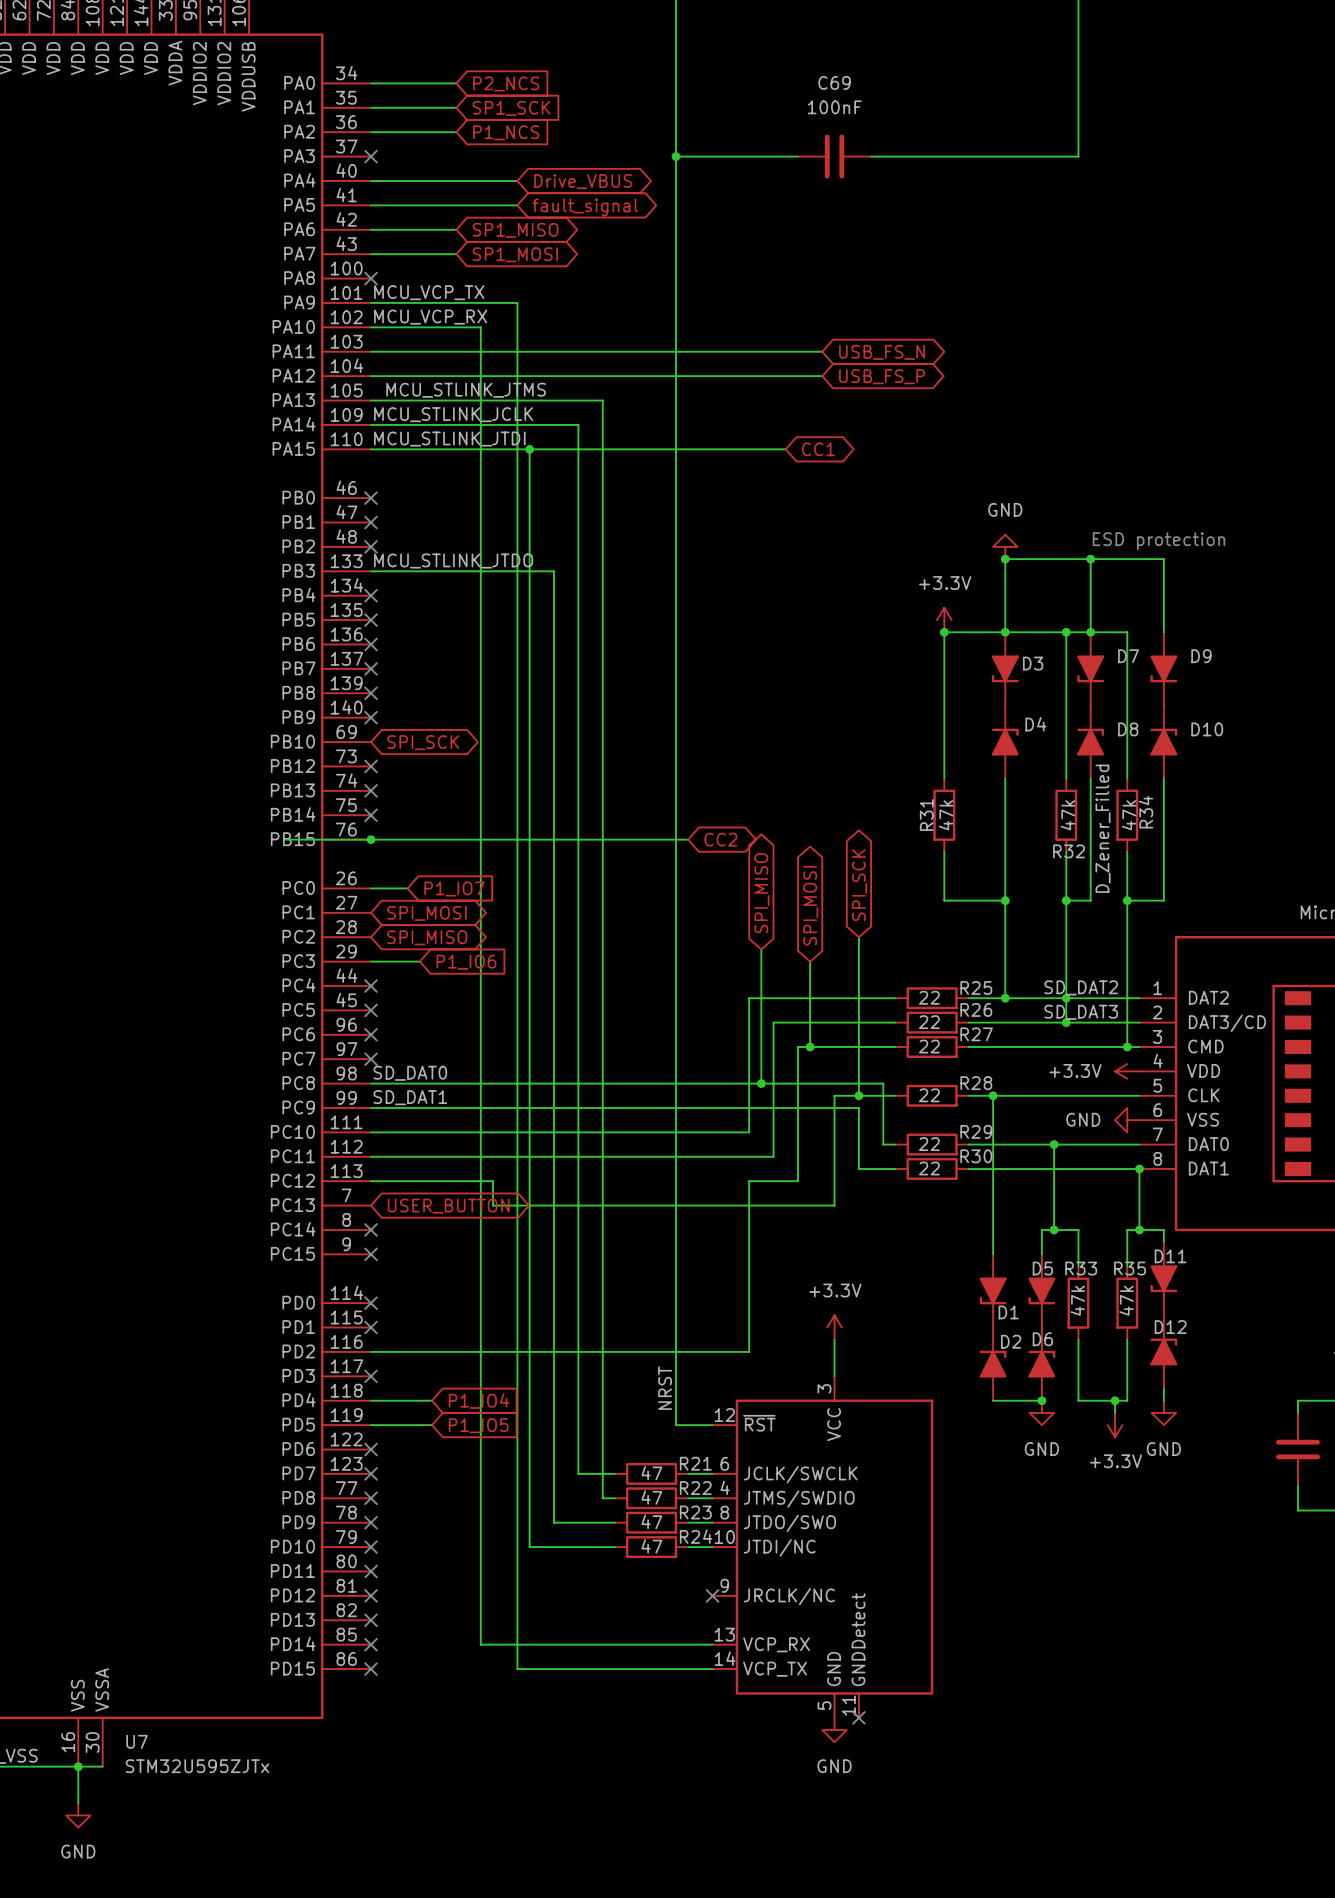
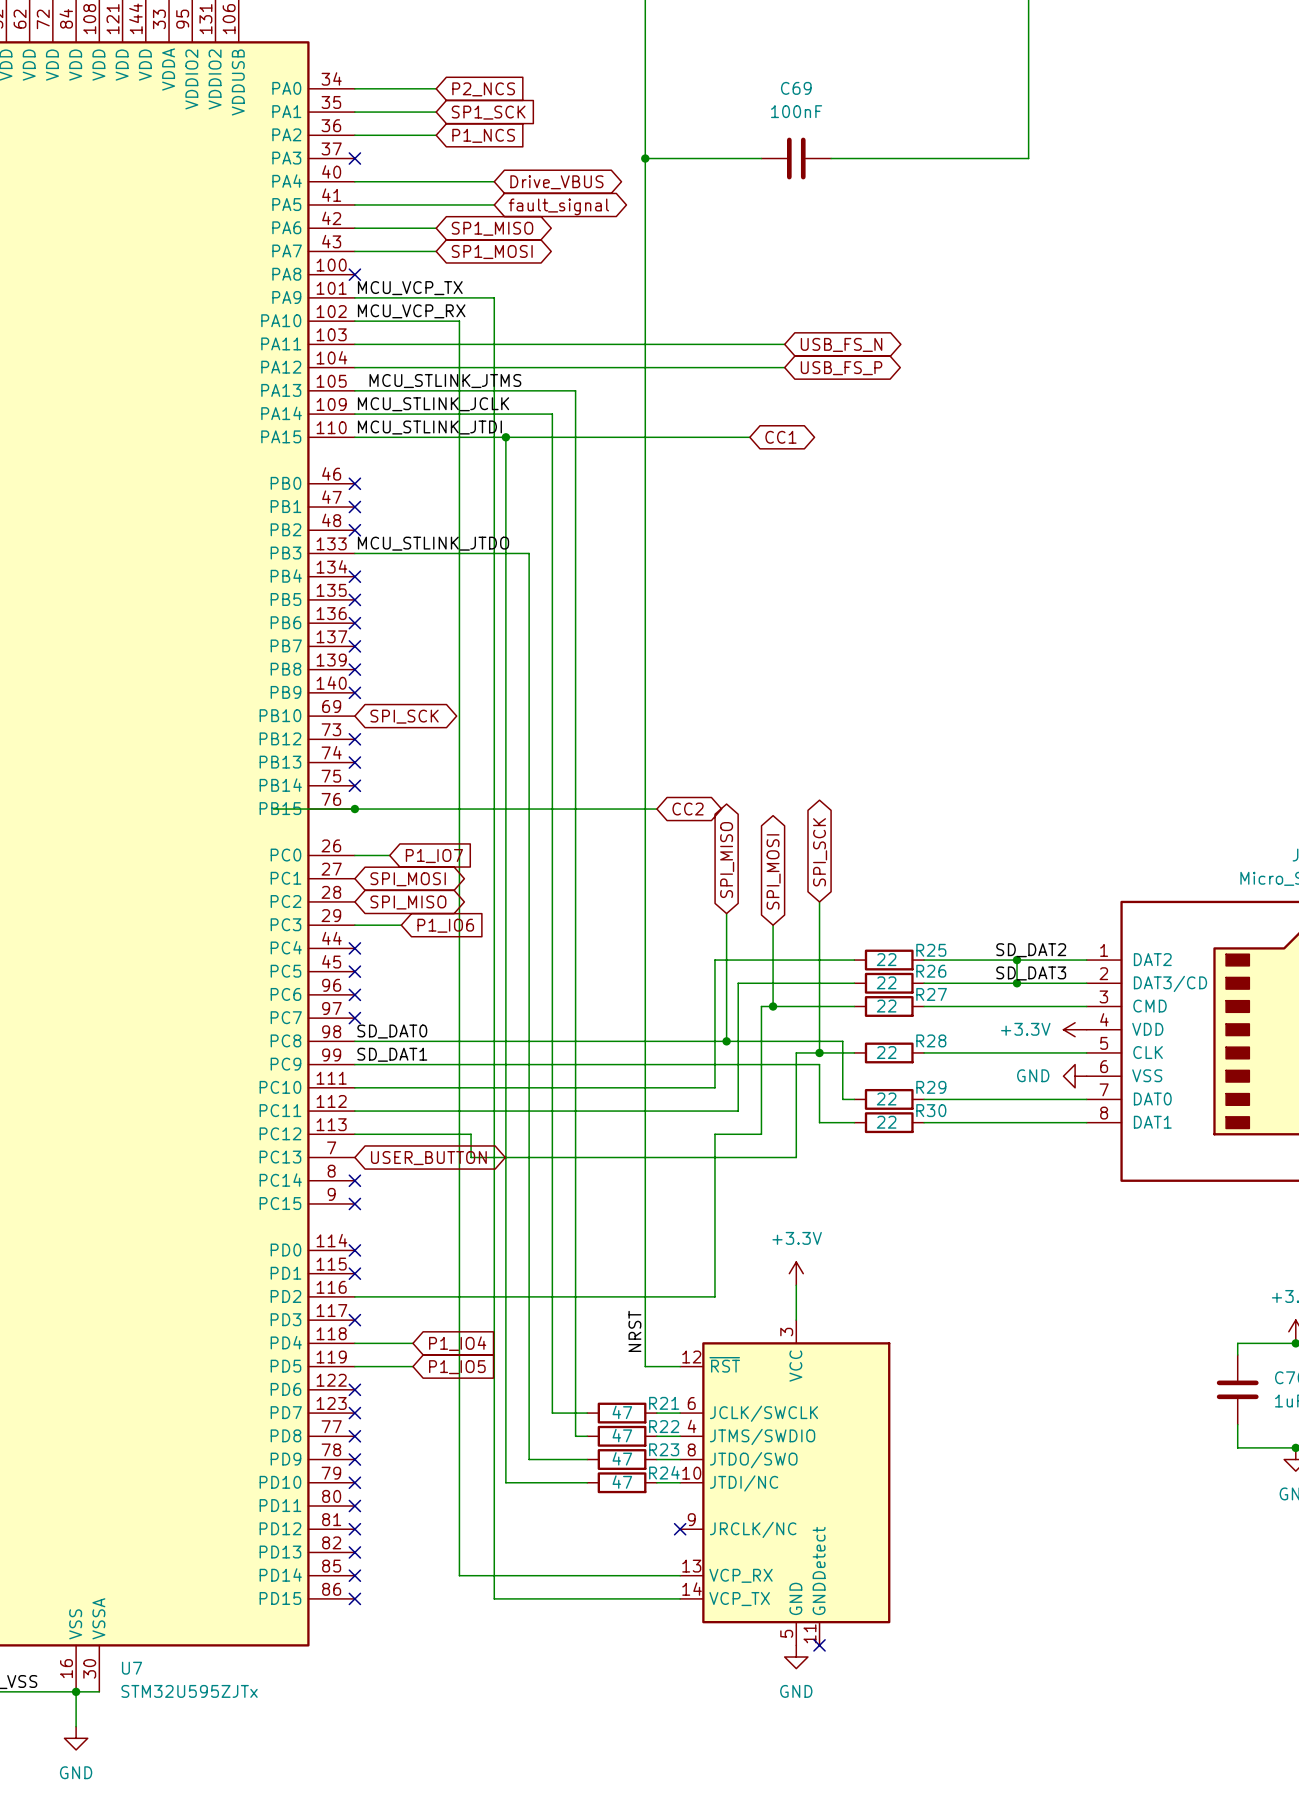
text: ESD protection (1158, 541) -> none
power symbol: GND (1005, 546) -> none
junction: (1005, 559) -> none
wire: (1090, 559) (1090, 632) -> none
junction: (1090, 559) -> none
power symbol: +3.3V (944, 620) -> none
junction: (944, 632) -> none
wire: (1005, 632) (1005, 559) (1163, 559) (1163, 632) -> none
junction: (1005, 632) -> none
wire: (1066, 632) (1066, 778) -> none
junction: (1066, 632) -> none
junction: (1090, 632) -> none
D3: (1005, 668) -> none
D7: (1090, 668) -> none
D9: (1163, 668) -> none
D4: (1005, 742) -> none
D8: D_Zener_Filled (1090, 742) -> none
D10: (1163, 742) -> none
wire: (944, 778) (944, 632) (1127, 632) (1127, 778) -> none
wire: (1005, 778) (1005, 998) -> none
wire: (1090, 778) (1090, 900) (1066, 900) -> none
wire: (1163, 778) (1163, 900) (1127, 900) -> none
R31: 47k (944, 815) -> none
R32: 47k (1066, 815) -> none
R34: 47k (1127, 815) -> none
wire: (944, 851) (944, 900) (1005, 900) -> none
wire: (1066, 851) (1066, 998) -> none
wire: (1127, 851) (1127, 1047) -> none
junction: (1005, 900) -> none
junction: (1066, 900) -> none
junction: (1127, 900) -> none
junction: (1005, 998) -> none
junction: (1127, 1047) -> none
wire: (993, 1095) (993, 1254) -> none
junction: (993, 1095) -> none
wire: (1054, 1144) (1054, 1229) -> none
junction: (1054, 1144) -> none
wire: (1139, 1168) (1139, 1229) -> none
junction: (1139, 1168) -> none
junction: (1054, 1229) -> none
junction: (1139, 1229) -> none
wire: (1163, 1242) (1163, 1229) (1127, 1229) (1127, 1266) -> none
wire: (1041, 1254) (1041, 1229) (1078, 1229) (1078, 1266) -> none
D11: (1163, 1278) -> none
D1: (993, 1290) -> none
D5: (1041, 1290) -> none
R33: 47k (1078, 1303) -> none
R35: 47k (1127, 1303) -> none
wire: (1078, 1339) (1078, 1400) (1127, 1400) (1127, 1339) -> none
D12: (1163, 1351) -> none
D2: (993, 1364) -> none
D6: (1041, 1364) -> none
wire: (1163, 1388) (1163, 1400) -> none
wire: (993, 1400) (1041, 1400) -> none
junction: (1041, 1400) -> none
wire: (1115, 1400) (1115, 1412) -> none
junction: (1115, 1400) -> none
power symbol: GND (1041, 1412) -> none
power symbol: GND (1163, 1412) -> none
power symbol: +3.3V (1115, 1425) -> none

